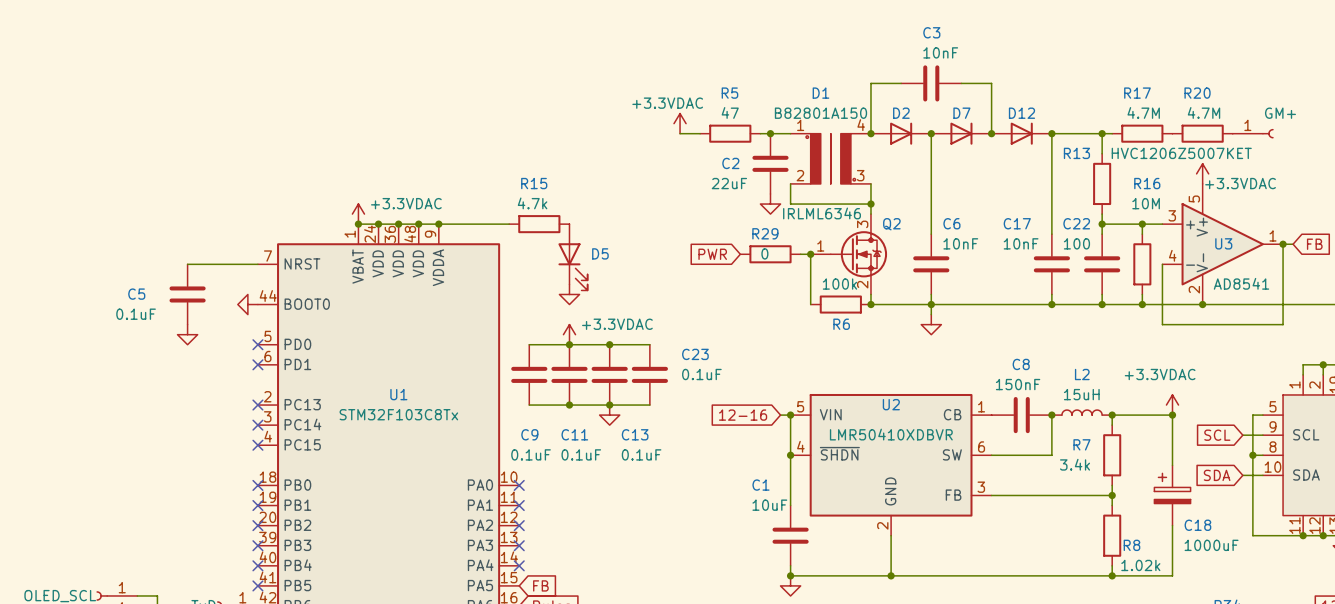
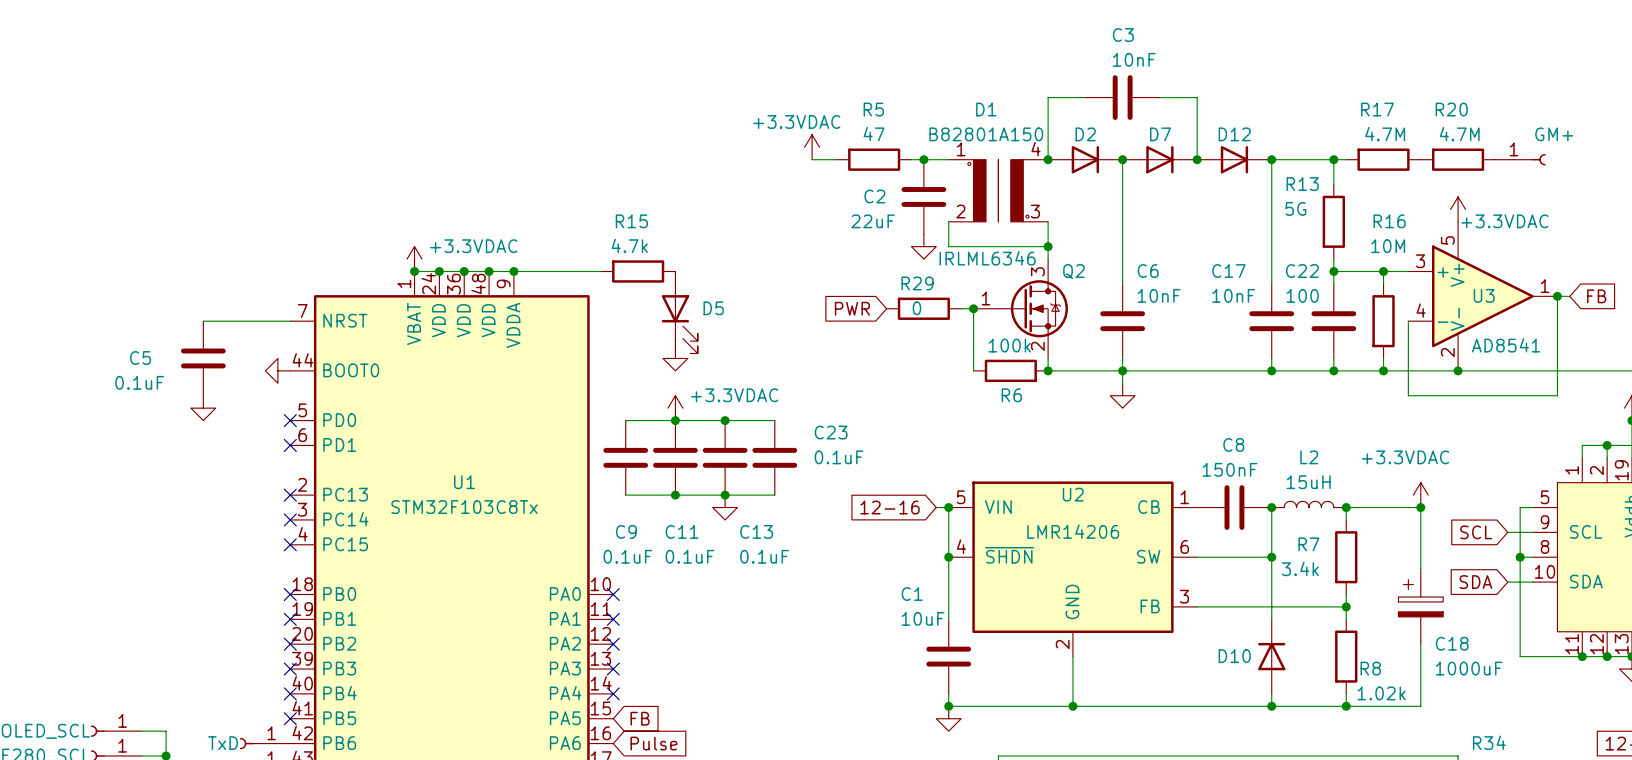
R13 value: HVC1206Z5007KET (1181, 153) -> 5G (1295, 208)
U2 value: LMR50410XDBVR (891, 434) -> LMR14206 (1073, 531)
wire: none -> (1271, 557) (1271, 619)
junction: none -> (1271, 557)
D10: none -> (1271, 656)
wire: none -> (1271, 693) (1271, 706)
junction: none -> (1271, 706)

